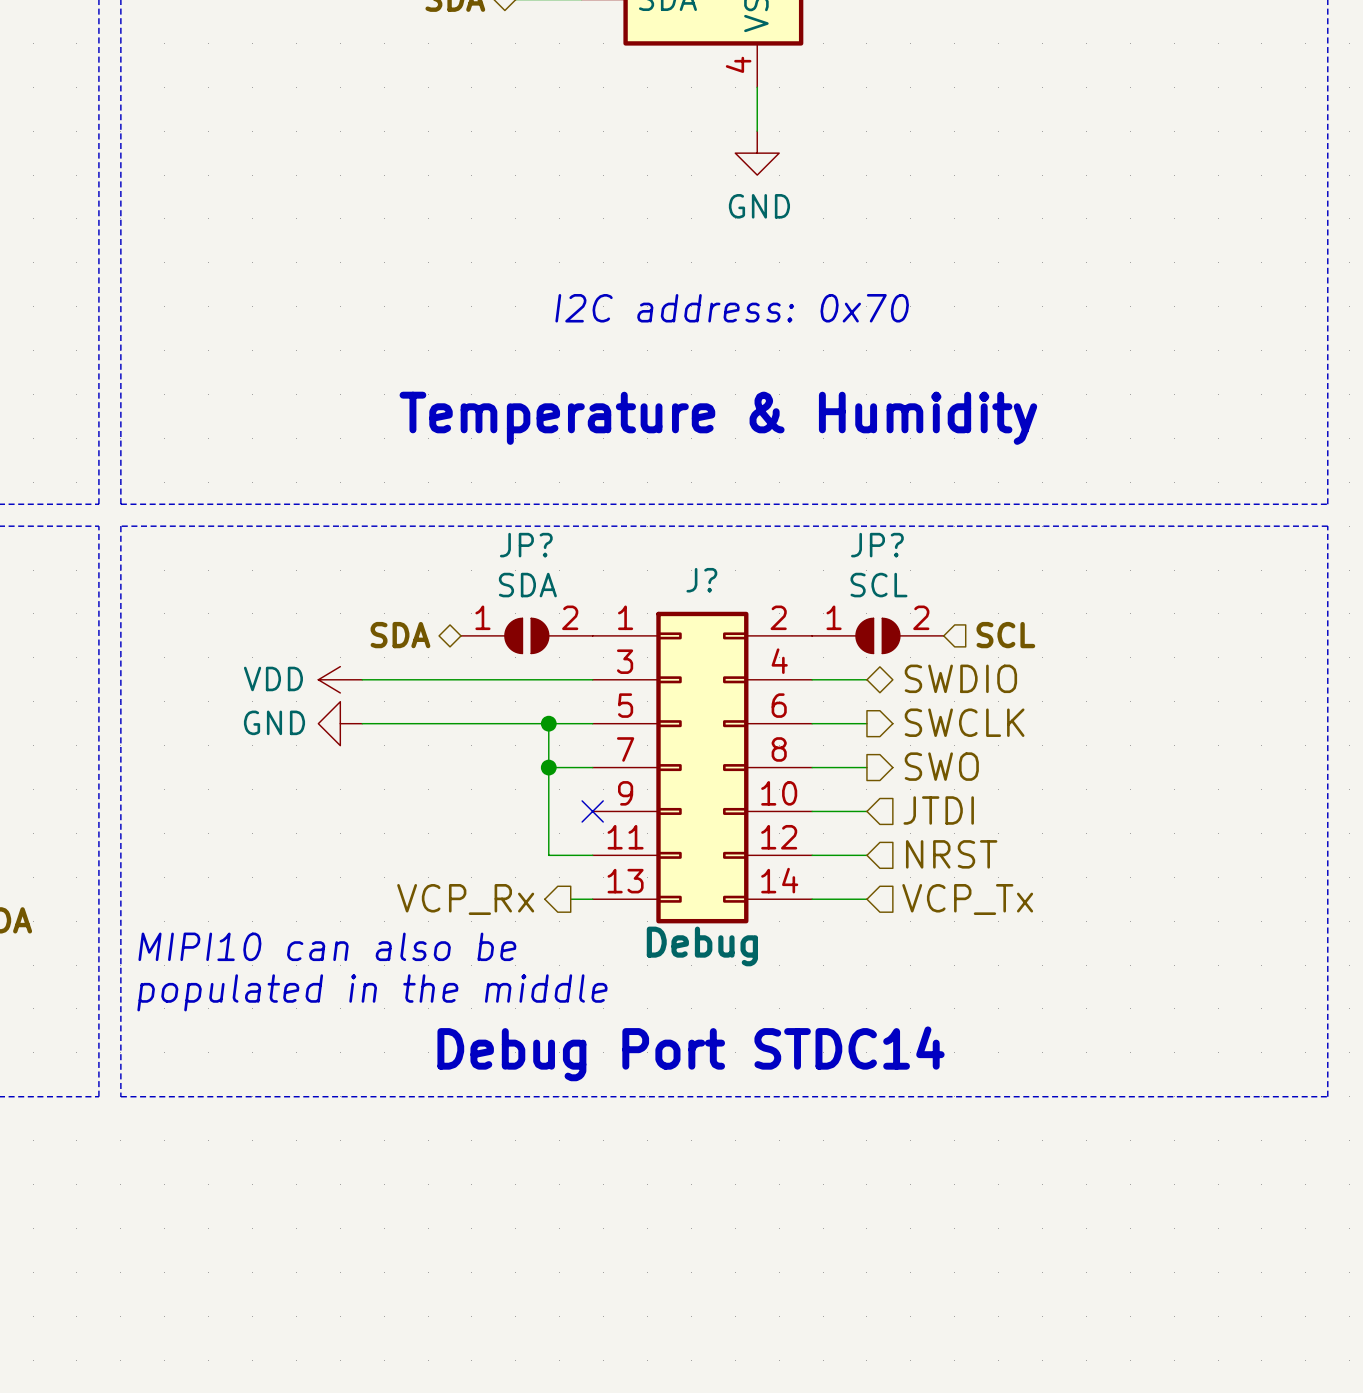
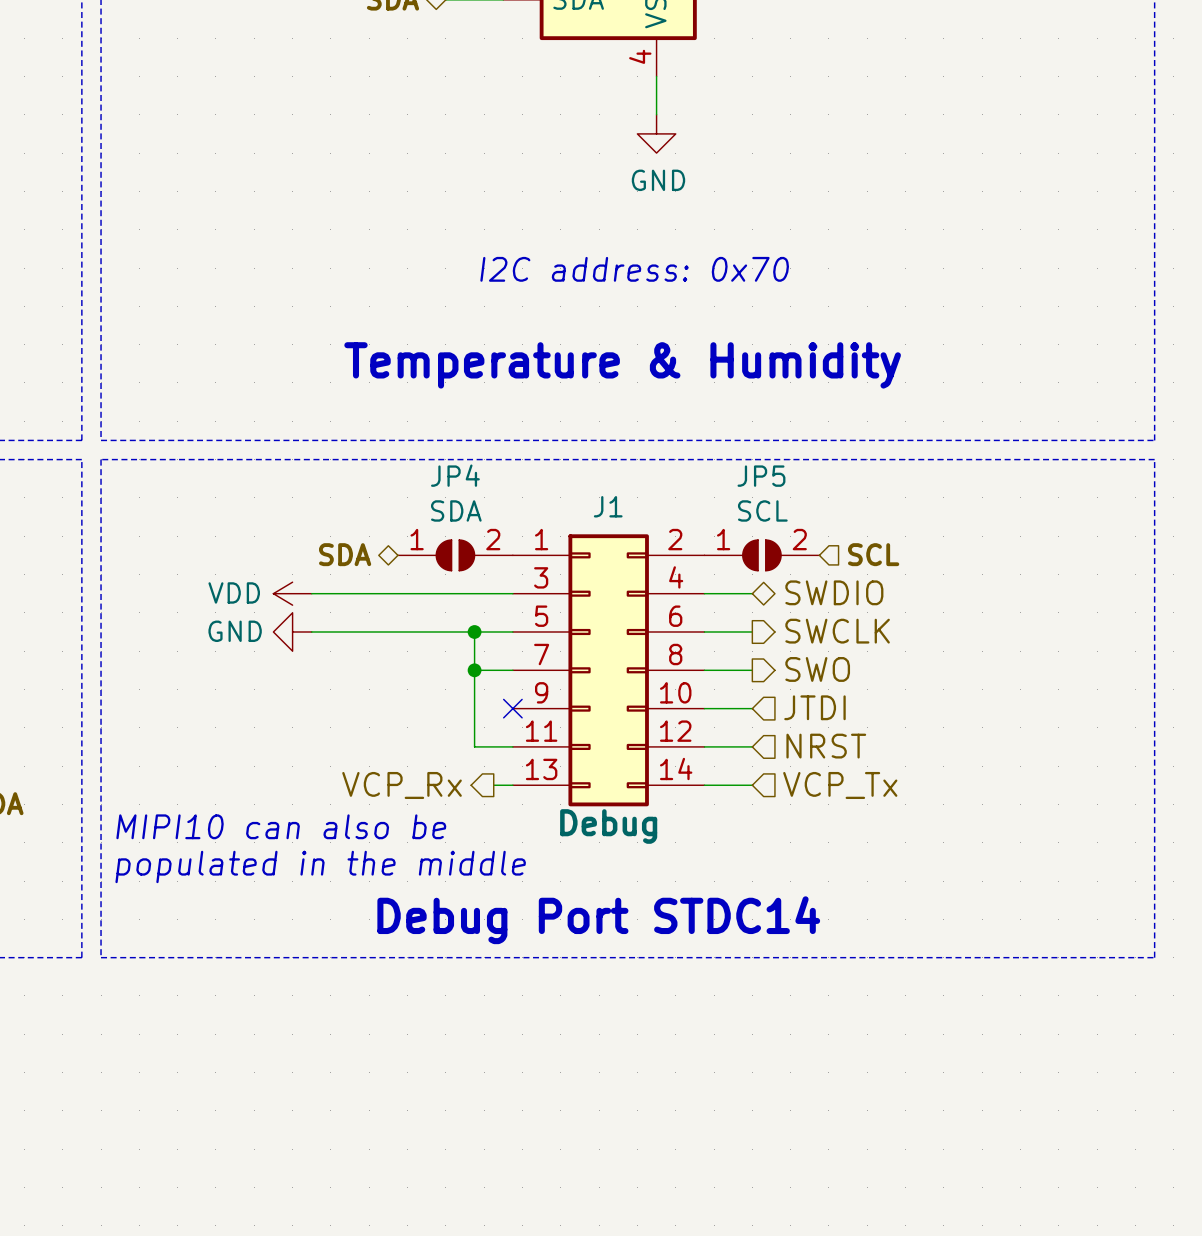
JP? name: JP? (526, 545) -> JP4 (455, 475)
JP? name: JP? (877, 545) -> JP5 (761, 476)
J? name: J? (701, 580) -> J1 (608, 506)

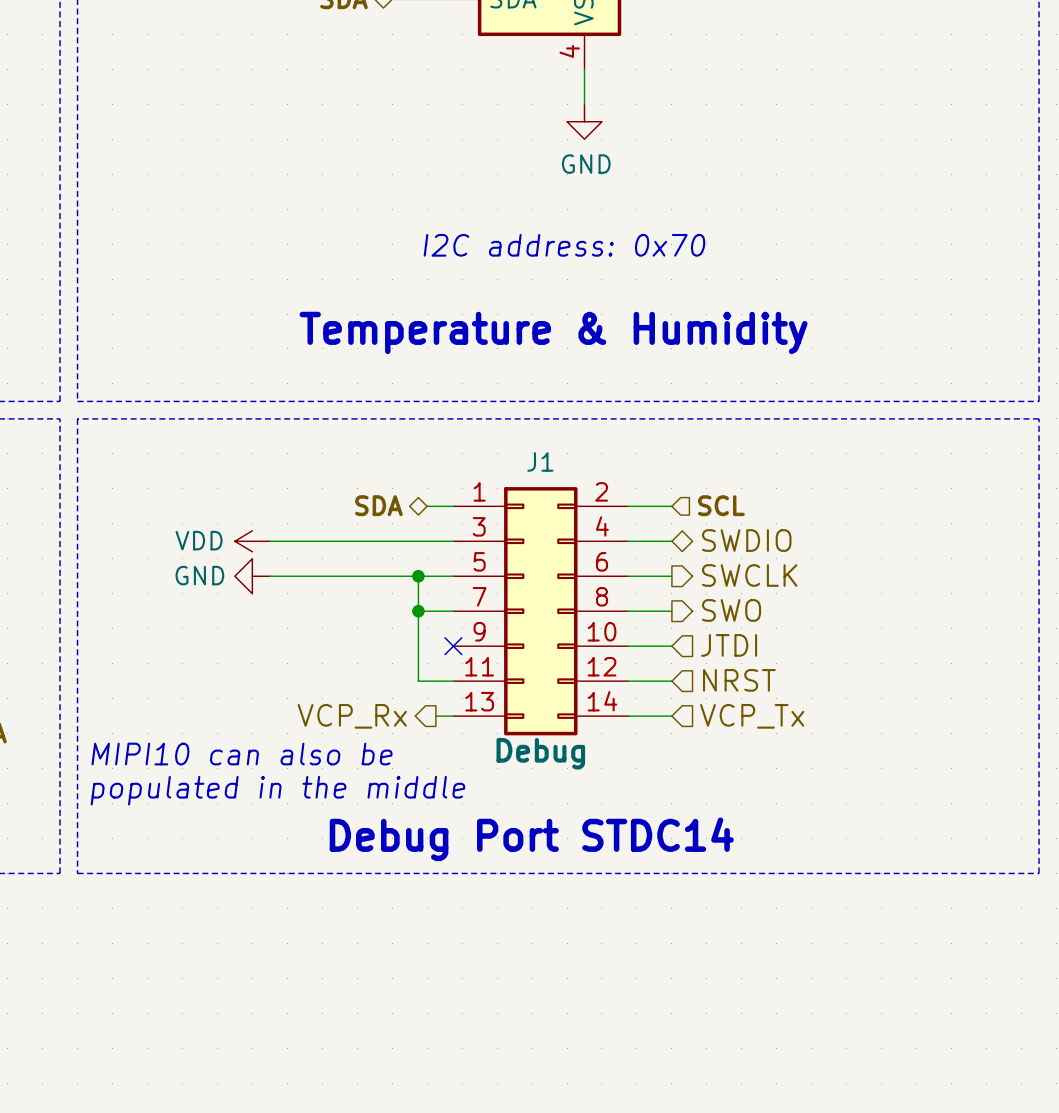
hierarchical label position: SDA (345, 554) -> SDA (378, 505)
hierarchical label position: SCL (873, 554) -> SCL (721, 505)
JP4: SDA (455, 555) -> none
JP5: SCL (761, 555) -> none

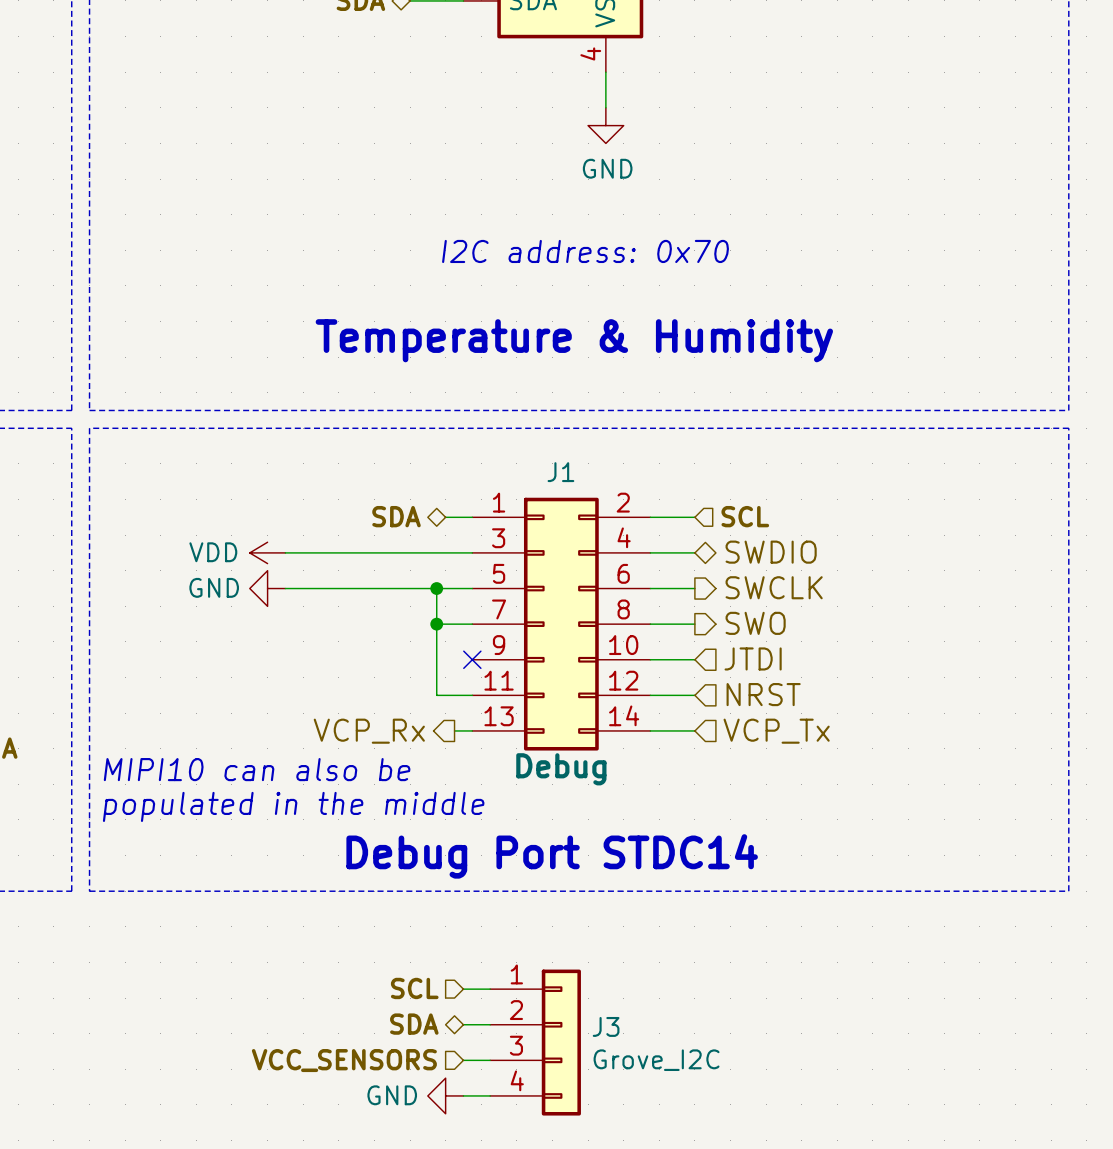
hierarchical label: none -> SCL (414, 988)
wire: none -> (463, 989) (490, 989)
hierarchical label: none -> SDA (414, 1024)
wire: none -> (463, 1024) (490, 1024)
J3: none -> Grove_I2C (535, 1042)
hierarchical label: none -> VCC_SENSORS (344, 1060)
wire: none -> (463, 1060) (490, 1060)
power symbol: none -> GND (445, 1095)
wire: none -> (463, 1095) (490, 1095)

